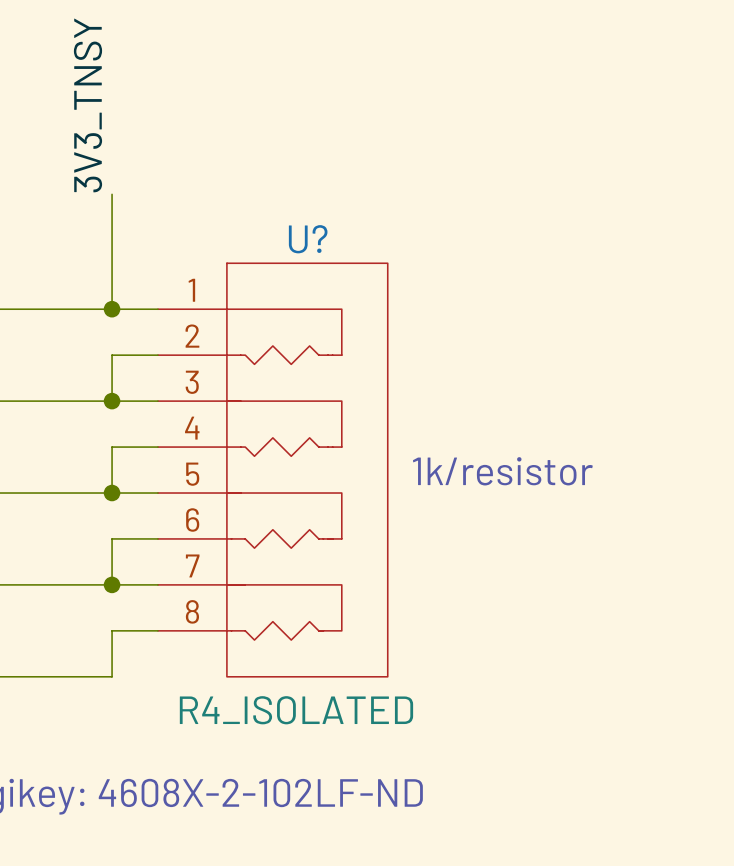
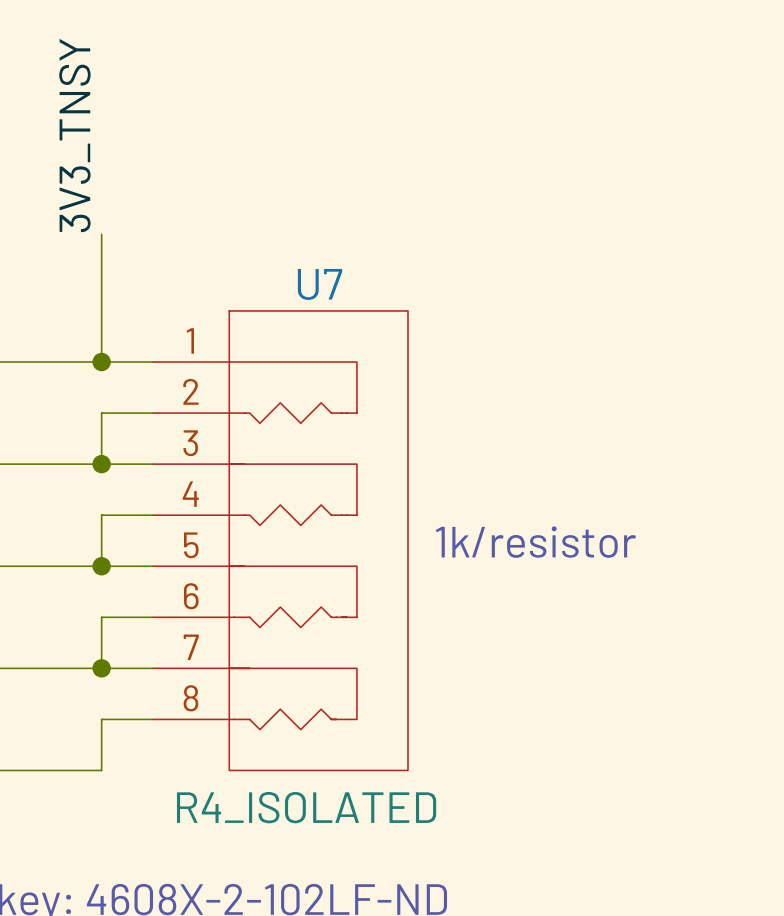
U? name: U? (308, 239) -> U7 (320, 284)

